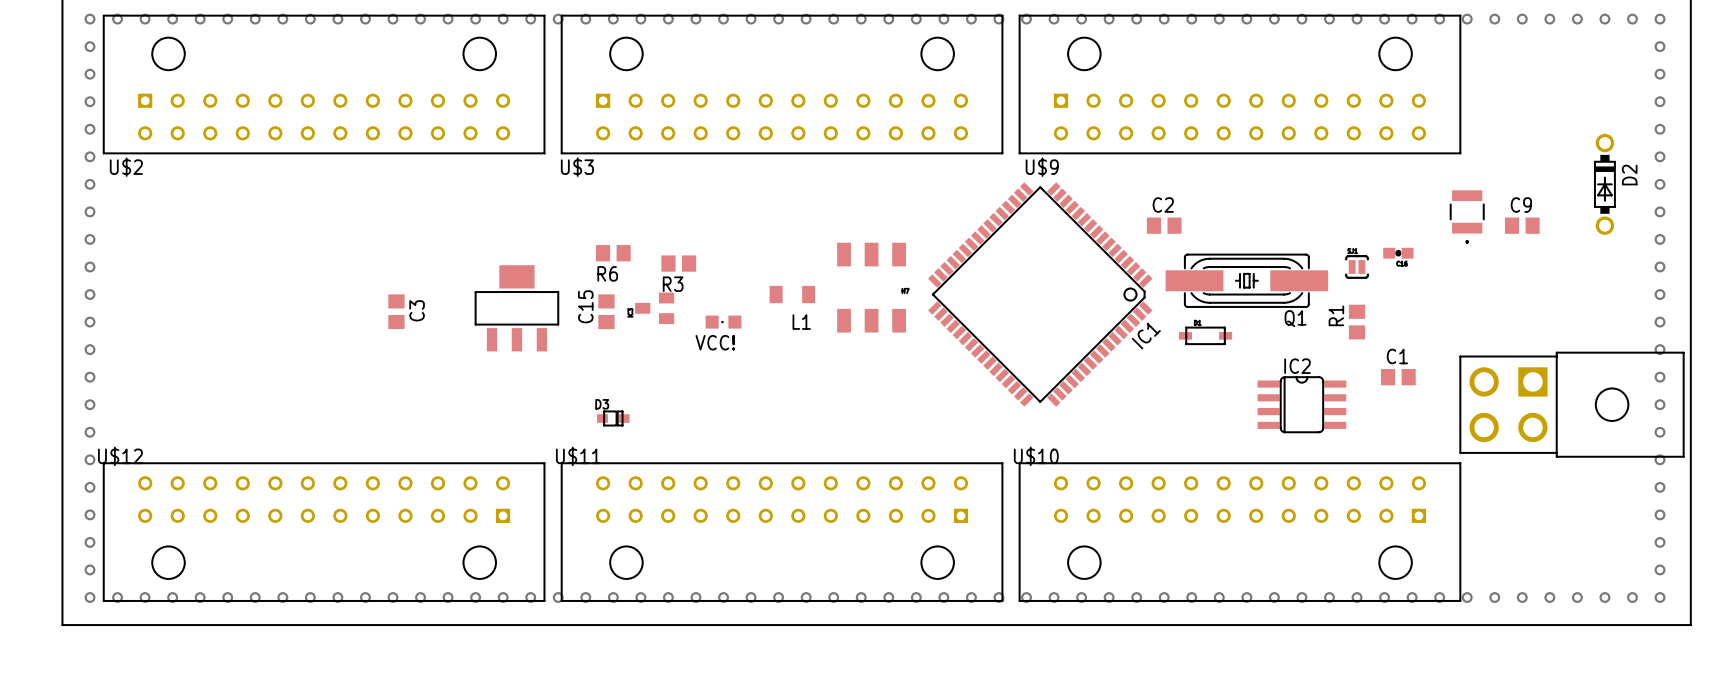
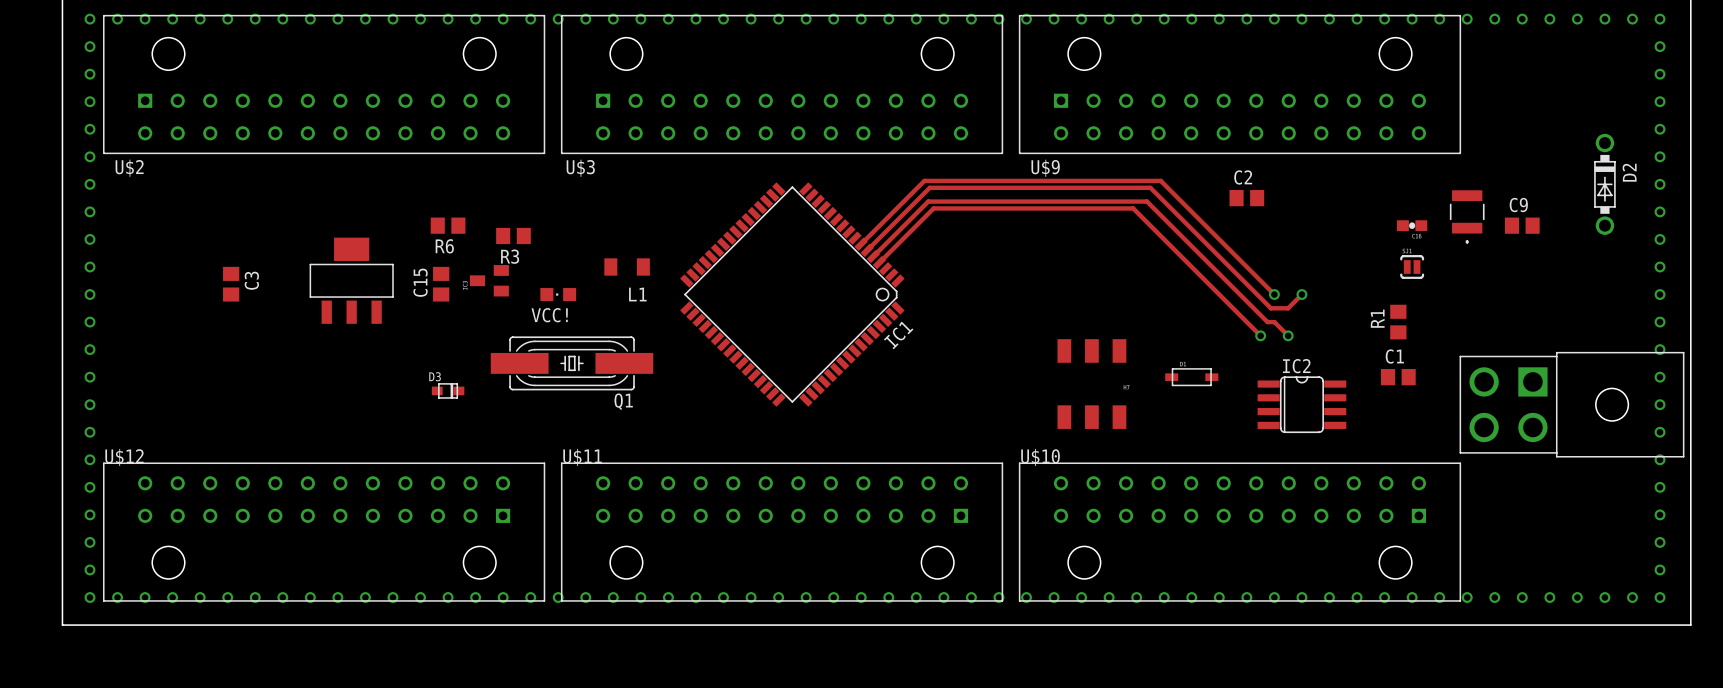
C2 position: (1164, 225) -> (1246, 198)
track: none -> (861, 244) (924, 180) (1160, 180) (1274, 294)
track: none -> (867, 250) (929, 187) (1150, 187) (1270, 308) (1288, 308) (1301, 294)
R6 position: (613, 253) -> (448, 225)
part position: (1398, 253) -> (1412, 225)
track: none -> (873, 256) (928, 201) (1147, 201) (1267, 322) (1274, 322) (1288, 335)
track: none -> (879, 262) (933, 208) (1133, 208) (1260, 335)
R3 position: (678, 263) -> (513, 236)
part position: (1357, 266) -> (1412, 266)
Q1 position: (1246, 280) -> (572, 363)
part position: (871, 287) -> (1091, 384)
L1 position: (792, 294) -> (627, 266)
IC1 position: (1040, 294) -> (792, 294)
via: none -> (1274, 294)
via: none -> (1301, 294)
part position: (516, 308) -> (351, 280)
part position: (654, 308) -> (489, 280)
C3 position: (396, 311) -> (231, 284)
C15 position: (606, 311) -> (441, 284)
VCC! position: (723, 322) -> (558, 294)
R1 position: (1357, 322) -> (1398, 322)
part position: (1205, 335) -> (1191, 377)
via: none -> (1260, 335)
via: none -> (1288, 335)
D3 position: (613, 418) -> (448, 390)

